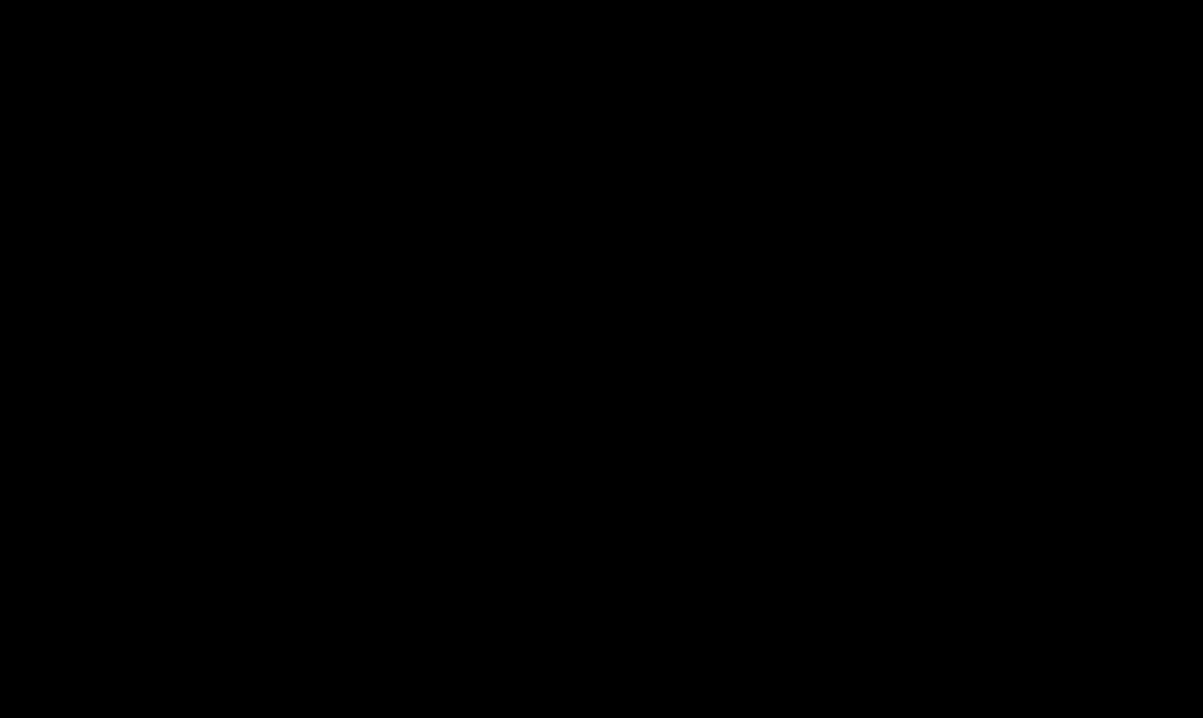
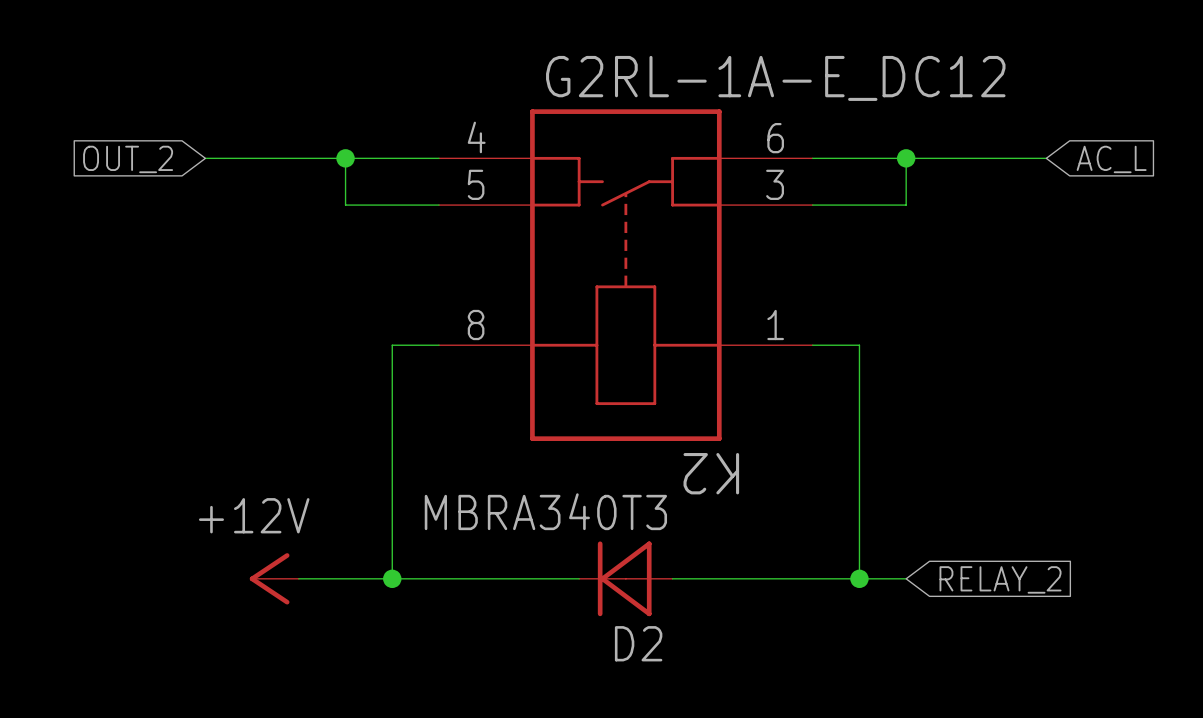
wire: none -> (205, 158) (438, 158)
wire: none -> (345, 158) (345, 205) (438, 205)
junction: none -> (345, 158)
wire: none -> (812, 158) (1046, 158)
wire: none -> (906, 158) (906, 205) (812, 205)
junction: none -> (906, 158)
global label: none -> OUT_2 (128, 159)
global label: none -> AC_L (1111, 159)
K2: none -> G2RL-1A-E_DC12 (625, 275)
wire: none -> (438, 345) (392, 345) (392, 578)
wire: none -> (812, 345) (859, 345) (859, 578)
power symbol: none -> +12V (274, 578)
wire: none -> (298, 578) (579, 578)
junction: none -> (392, 578)
D2: none -> MBRA340T3 (625, 578)
wire: none -> (672, 578) (906, 578)
junction: none -> (859, 578)
global label: none -> RELAY_2 (1000, 579)

